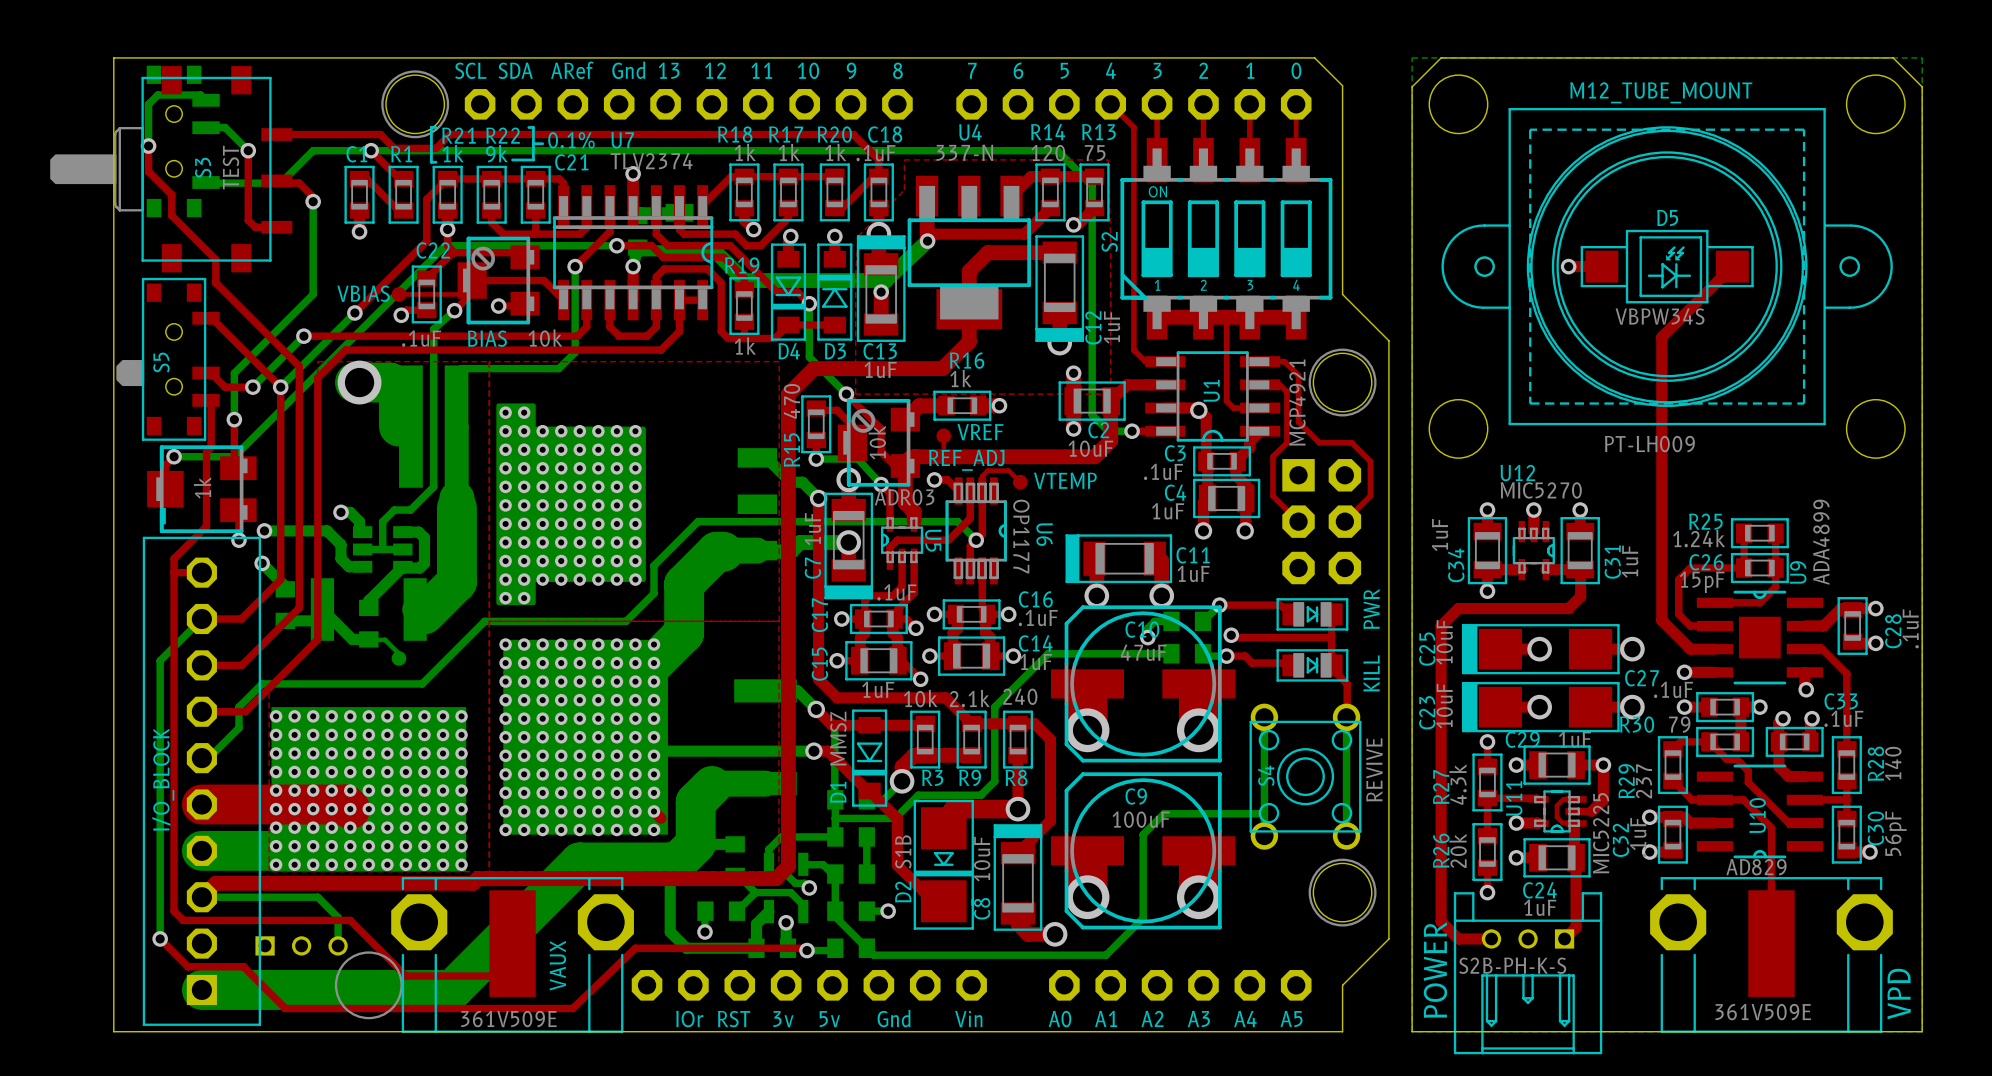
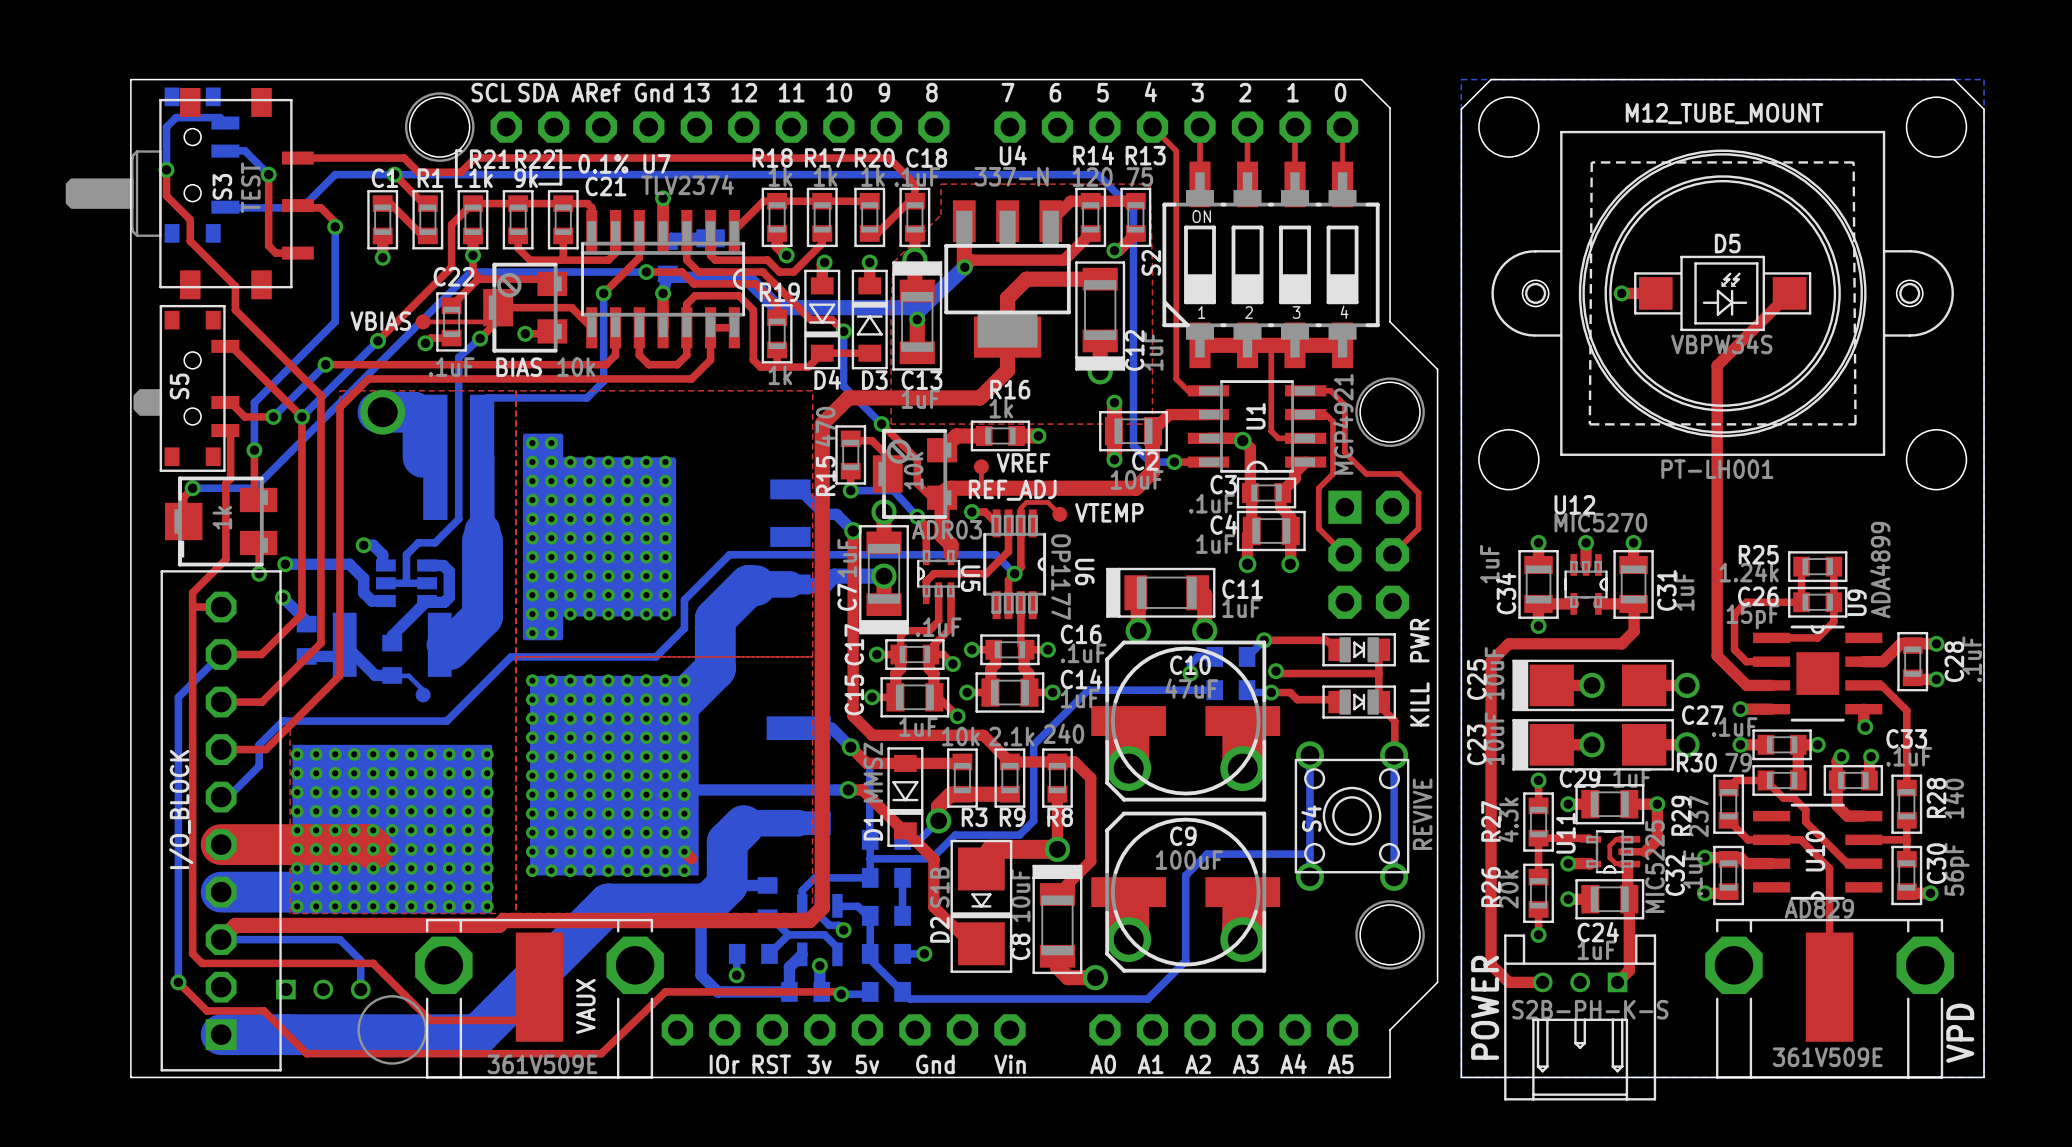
M12_TUBE_MOUNT footprint: [1441, 107, 1893, 426] -> [1491, 130, 1954, 456]
M12_TUBE_MOUNT value: PT-LH009 (1649, 444) -> PT-LH001 (1717, 469)

